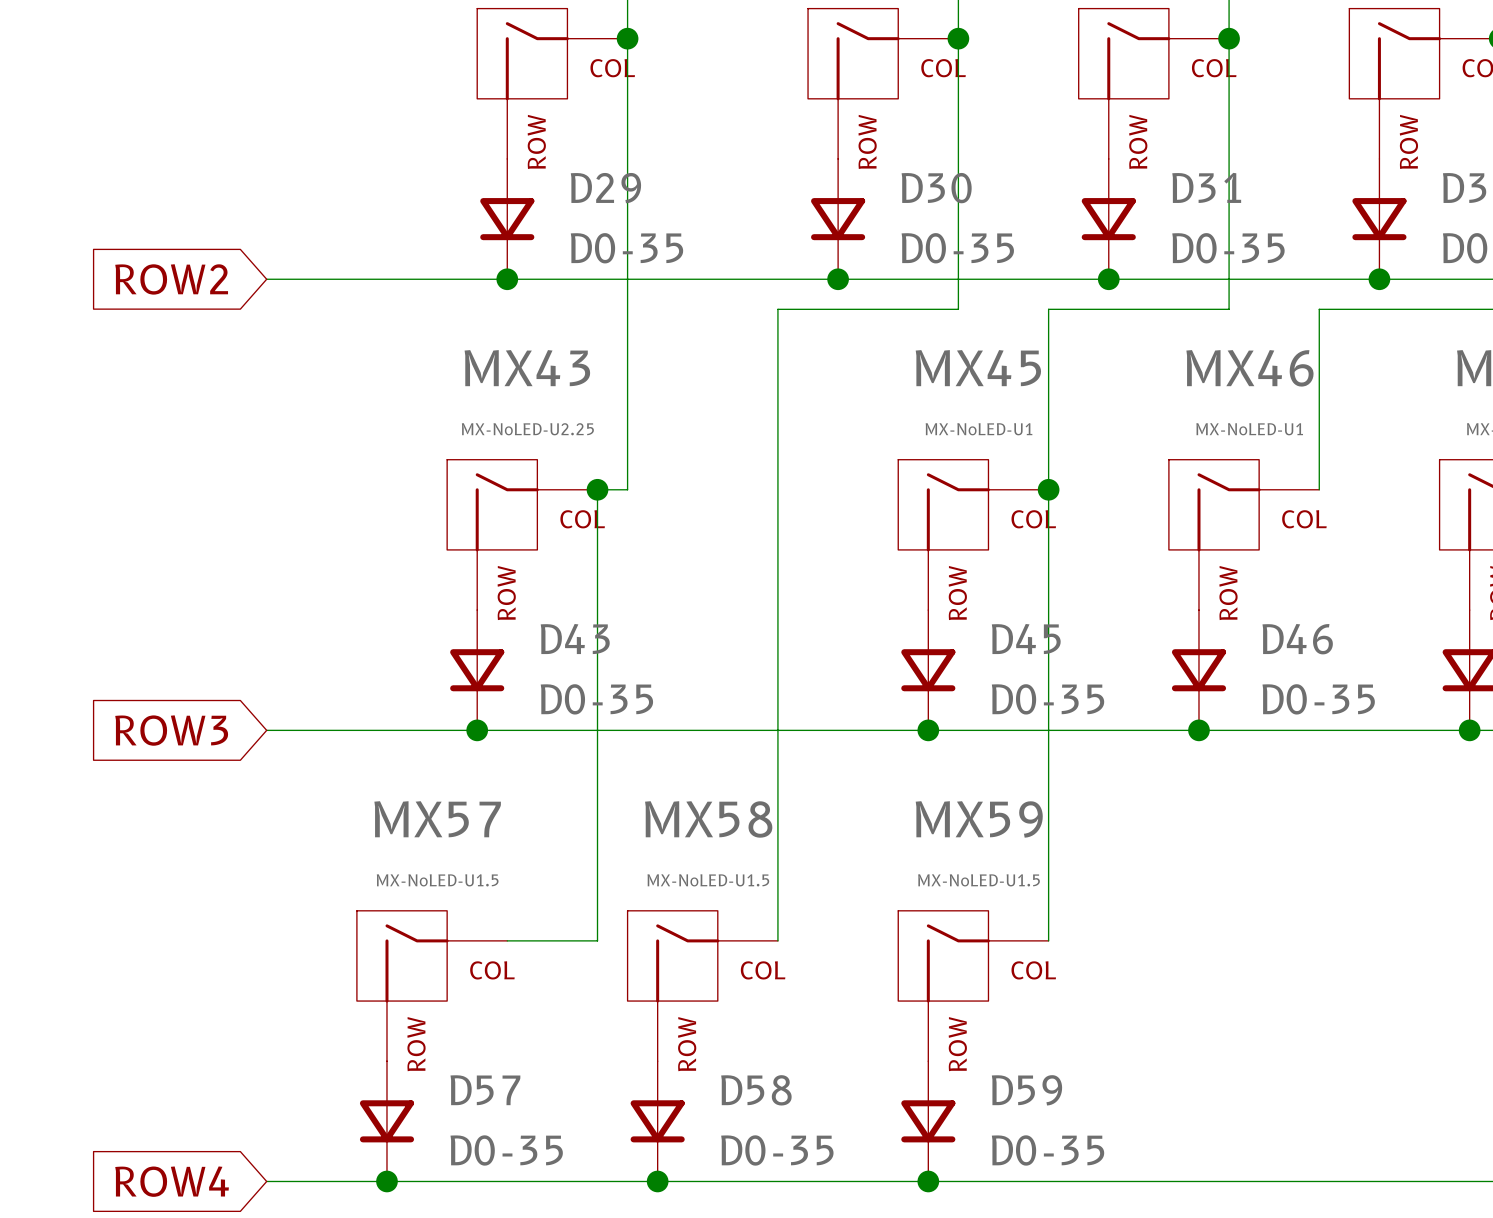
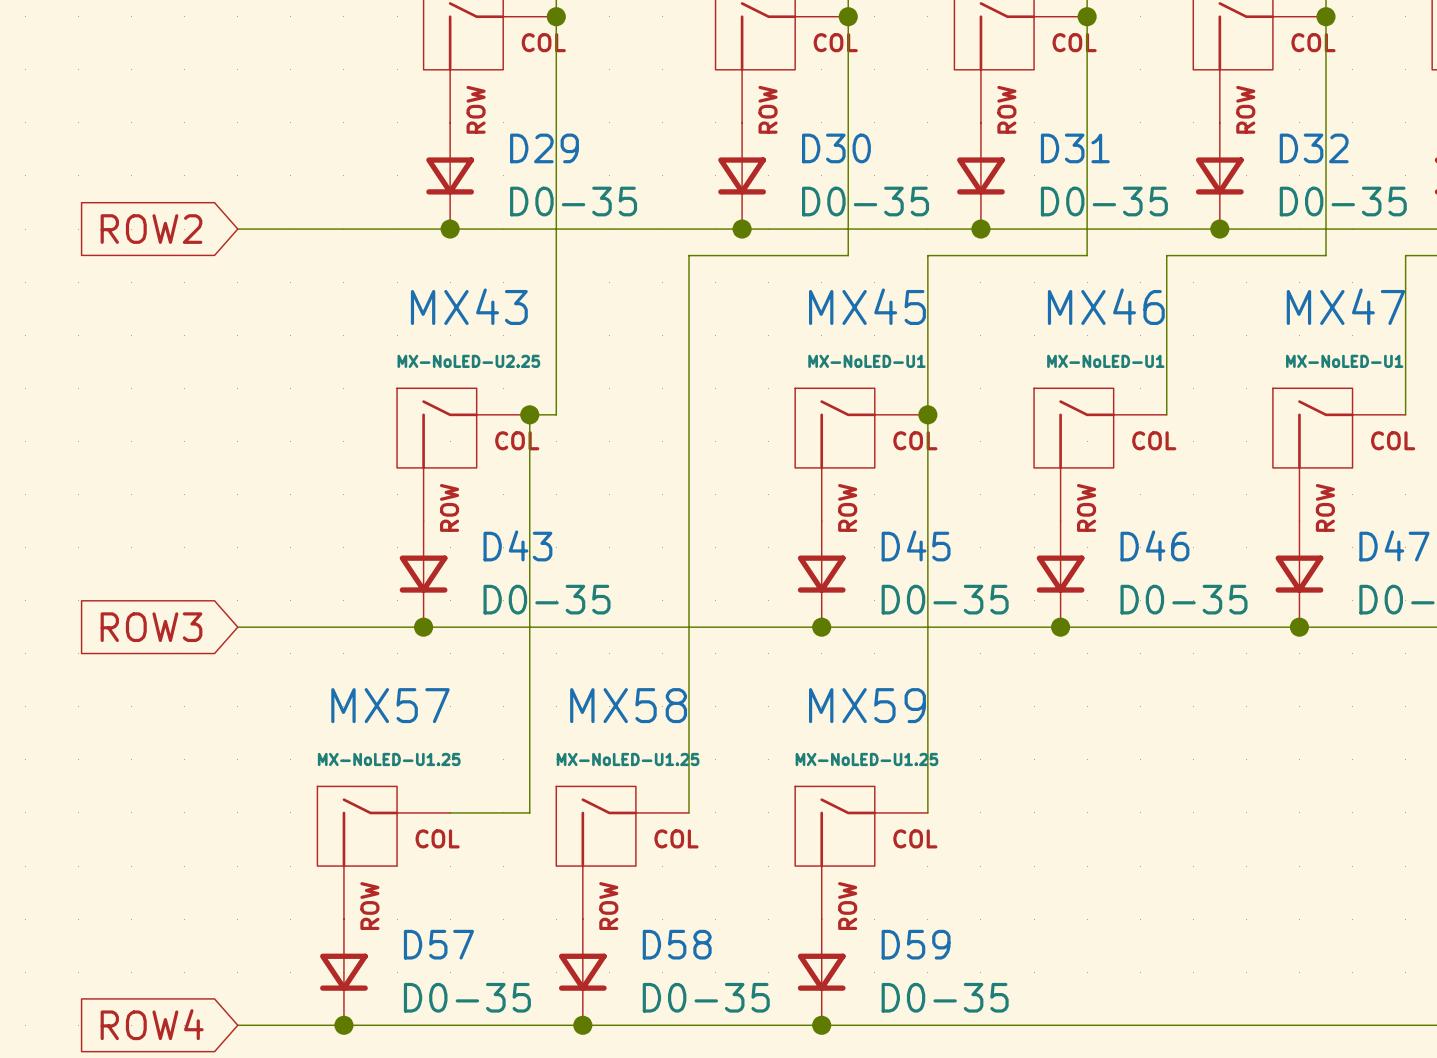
MX57 value: MX-NoLED-U1.5 (437, 880) -> MX-NoLED-U1.25 (389, 759)
MX58 value: MX-NoLED-U1.5 (708, 880) -> MX-NoLED-U1.25 (628, 759)
MX59 value: MX-NoLED-U1.5 (979, 880) -> MX-NoLED-U1.25 (866, 759)

